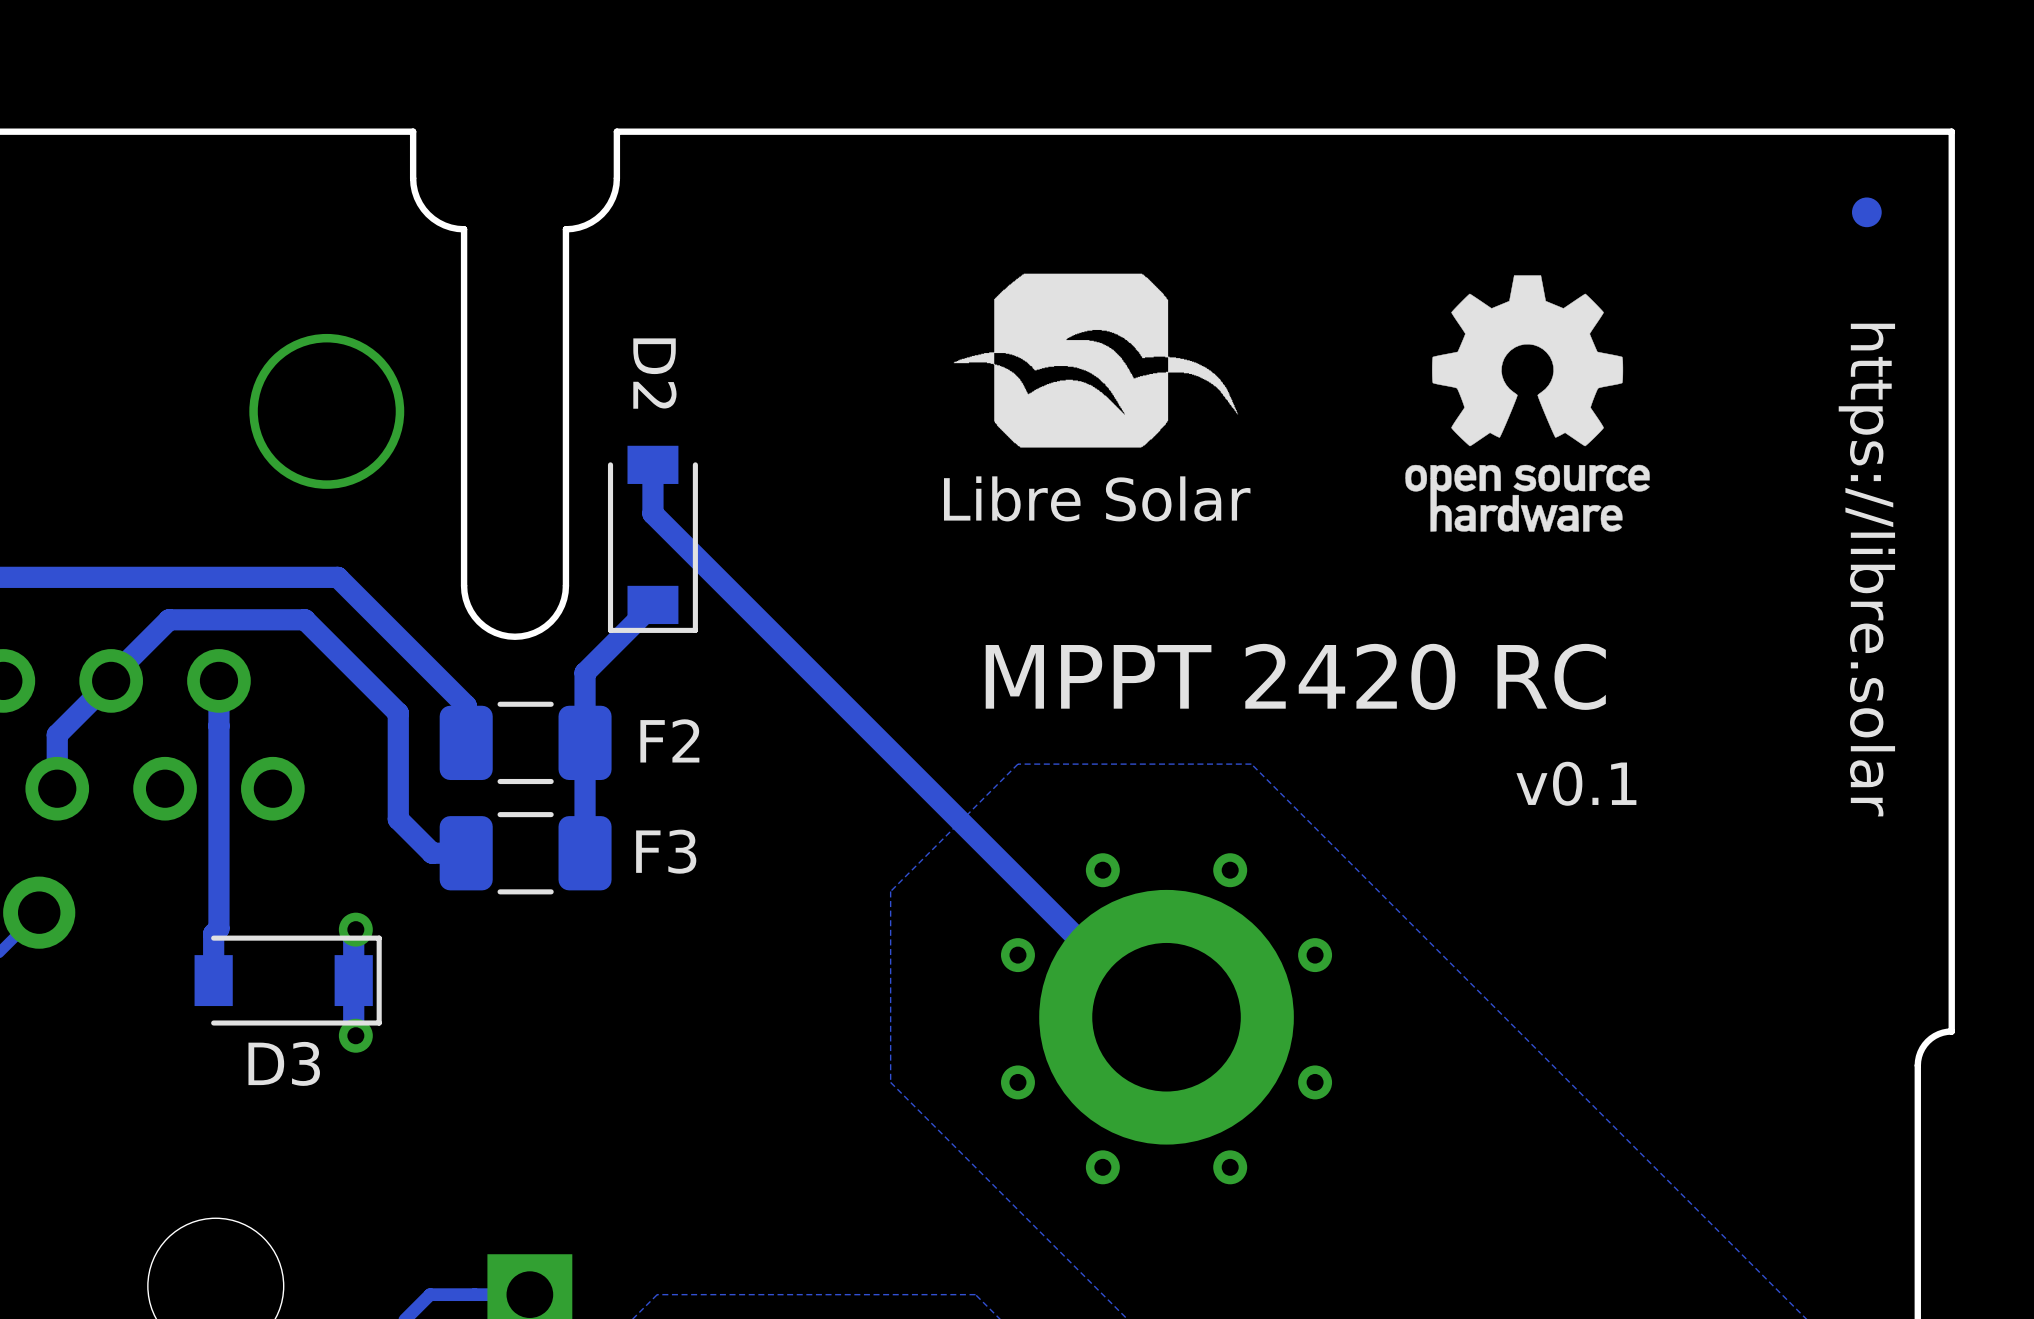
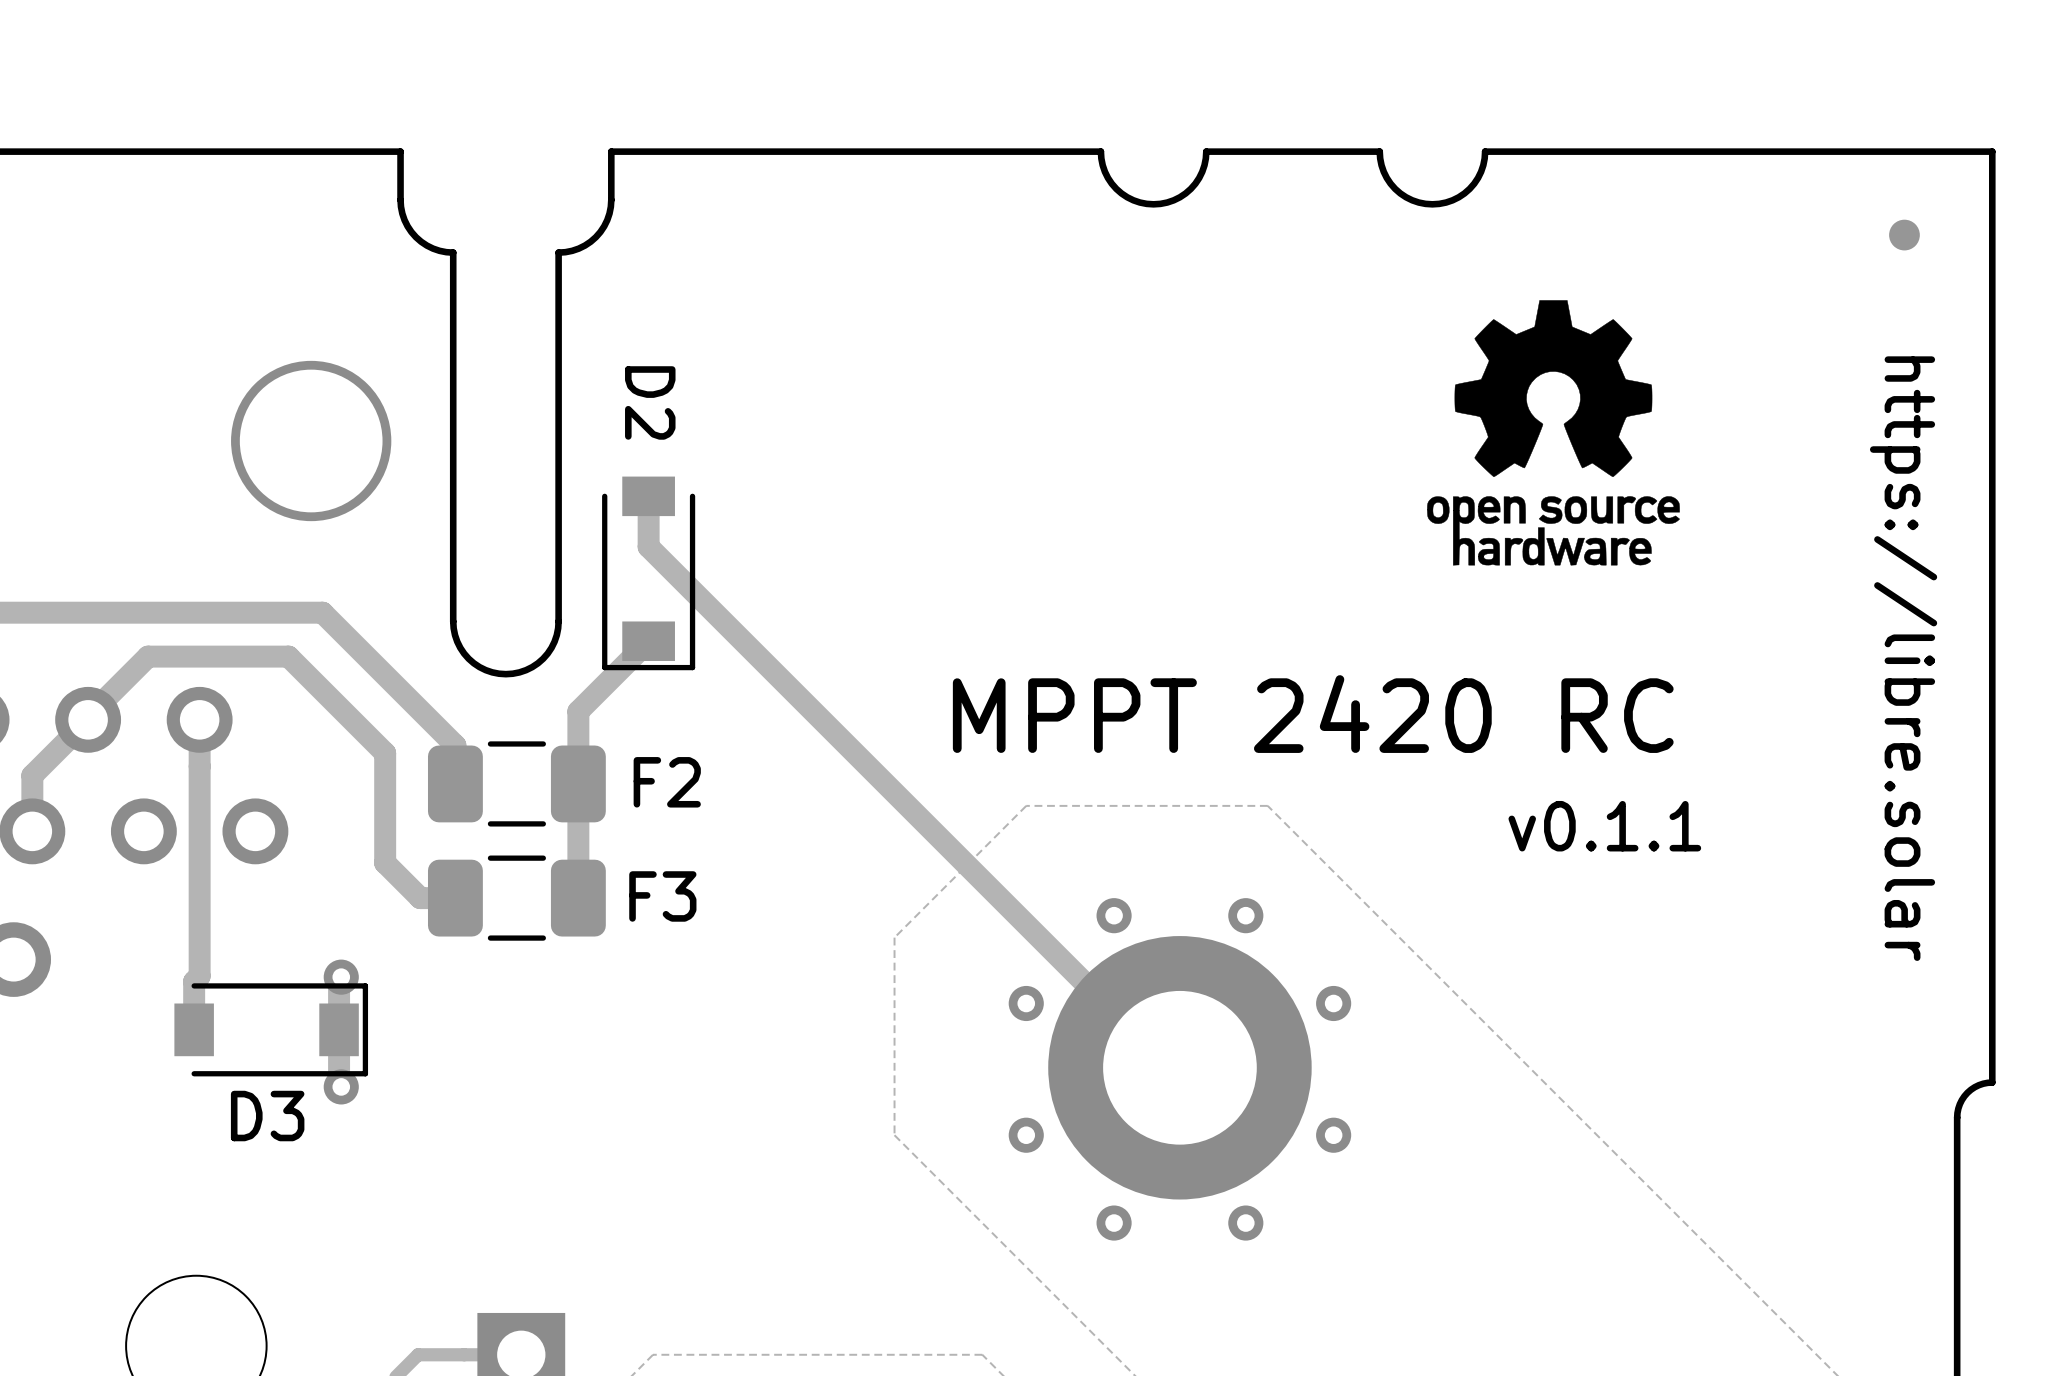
board edge: (1191, 131) (1090, 131) -> (1206, 151) (1202, 171) (1190, 188) (1173, 200) (1153, 204) (1133, 200) (1116, 188) (1104, 171) (1100, 151)
board edge: (1461, 131) (1359, 131) -> (1485, 151) (1481, 171) (1469, 188) (1452, 200) (1432, 204) (1412, 200) (1395, 188) (1383, 171) (1379, 151)
drawing: [953, 273, 1239, 448] -> none
text: v0.1 (1576, 783) -> v0.1.1 (1604, 826)

